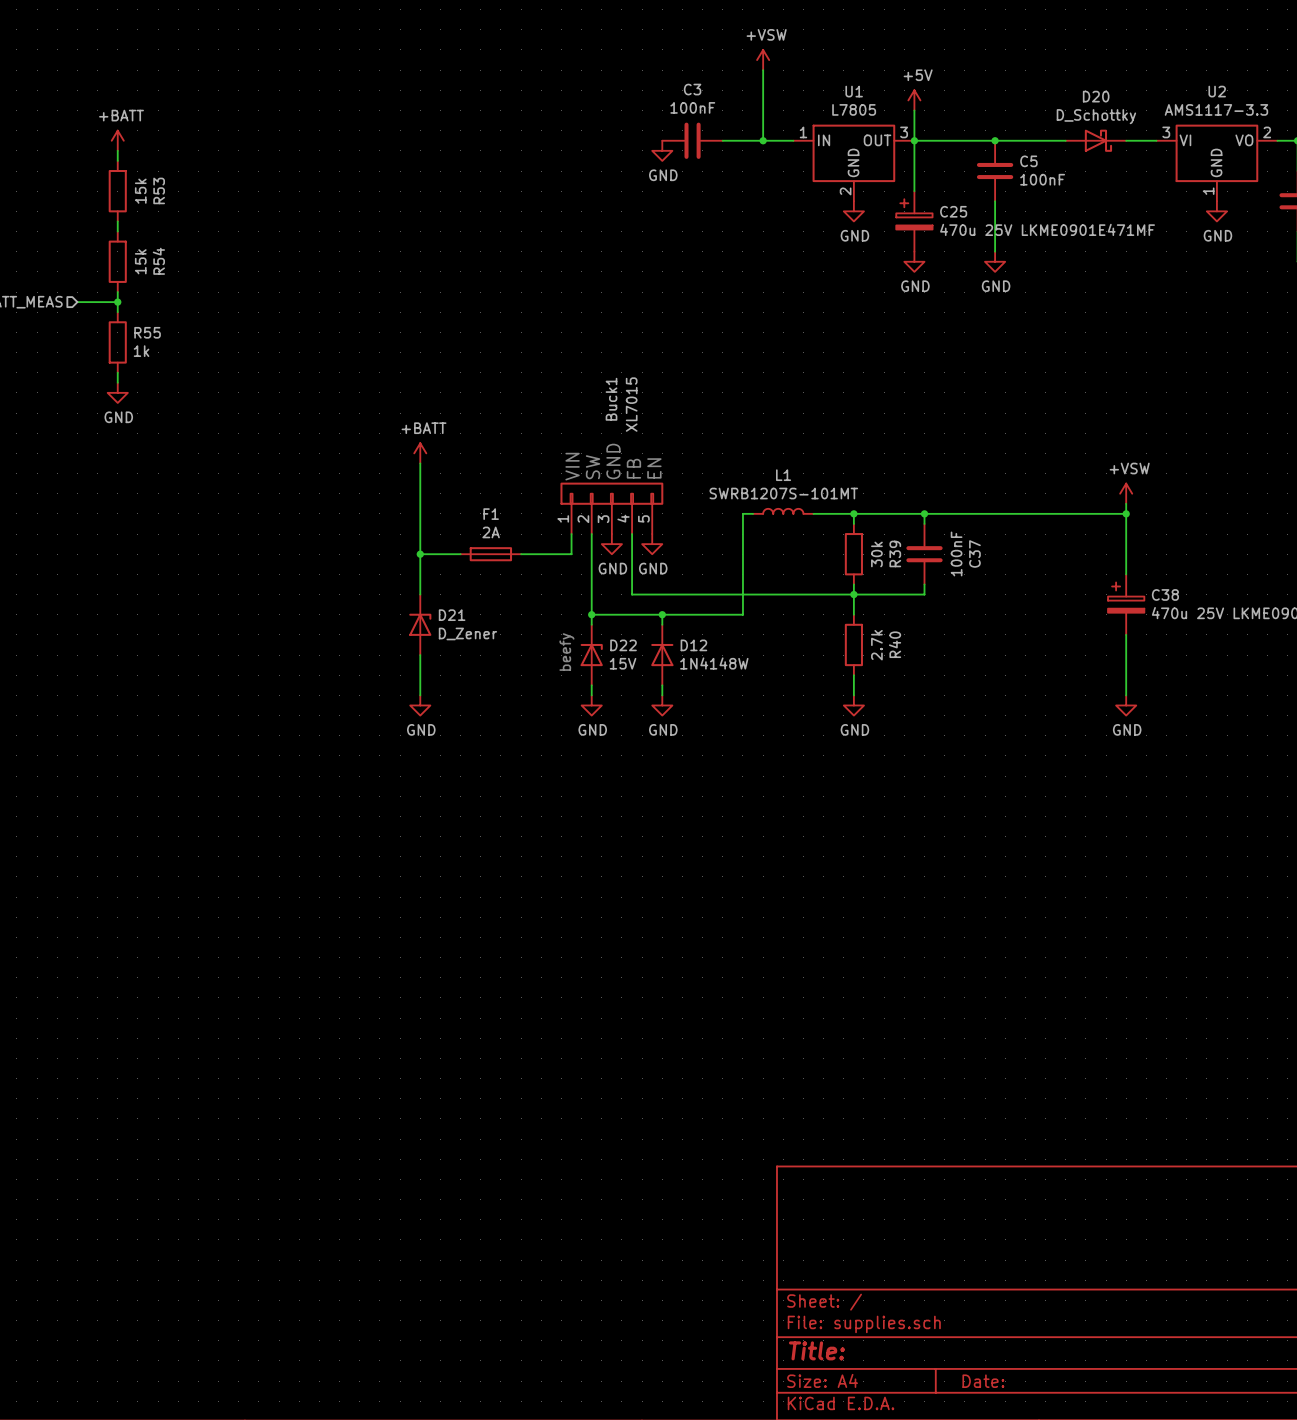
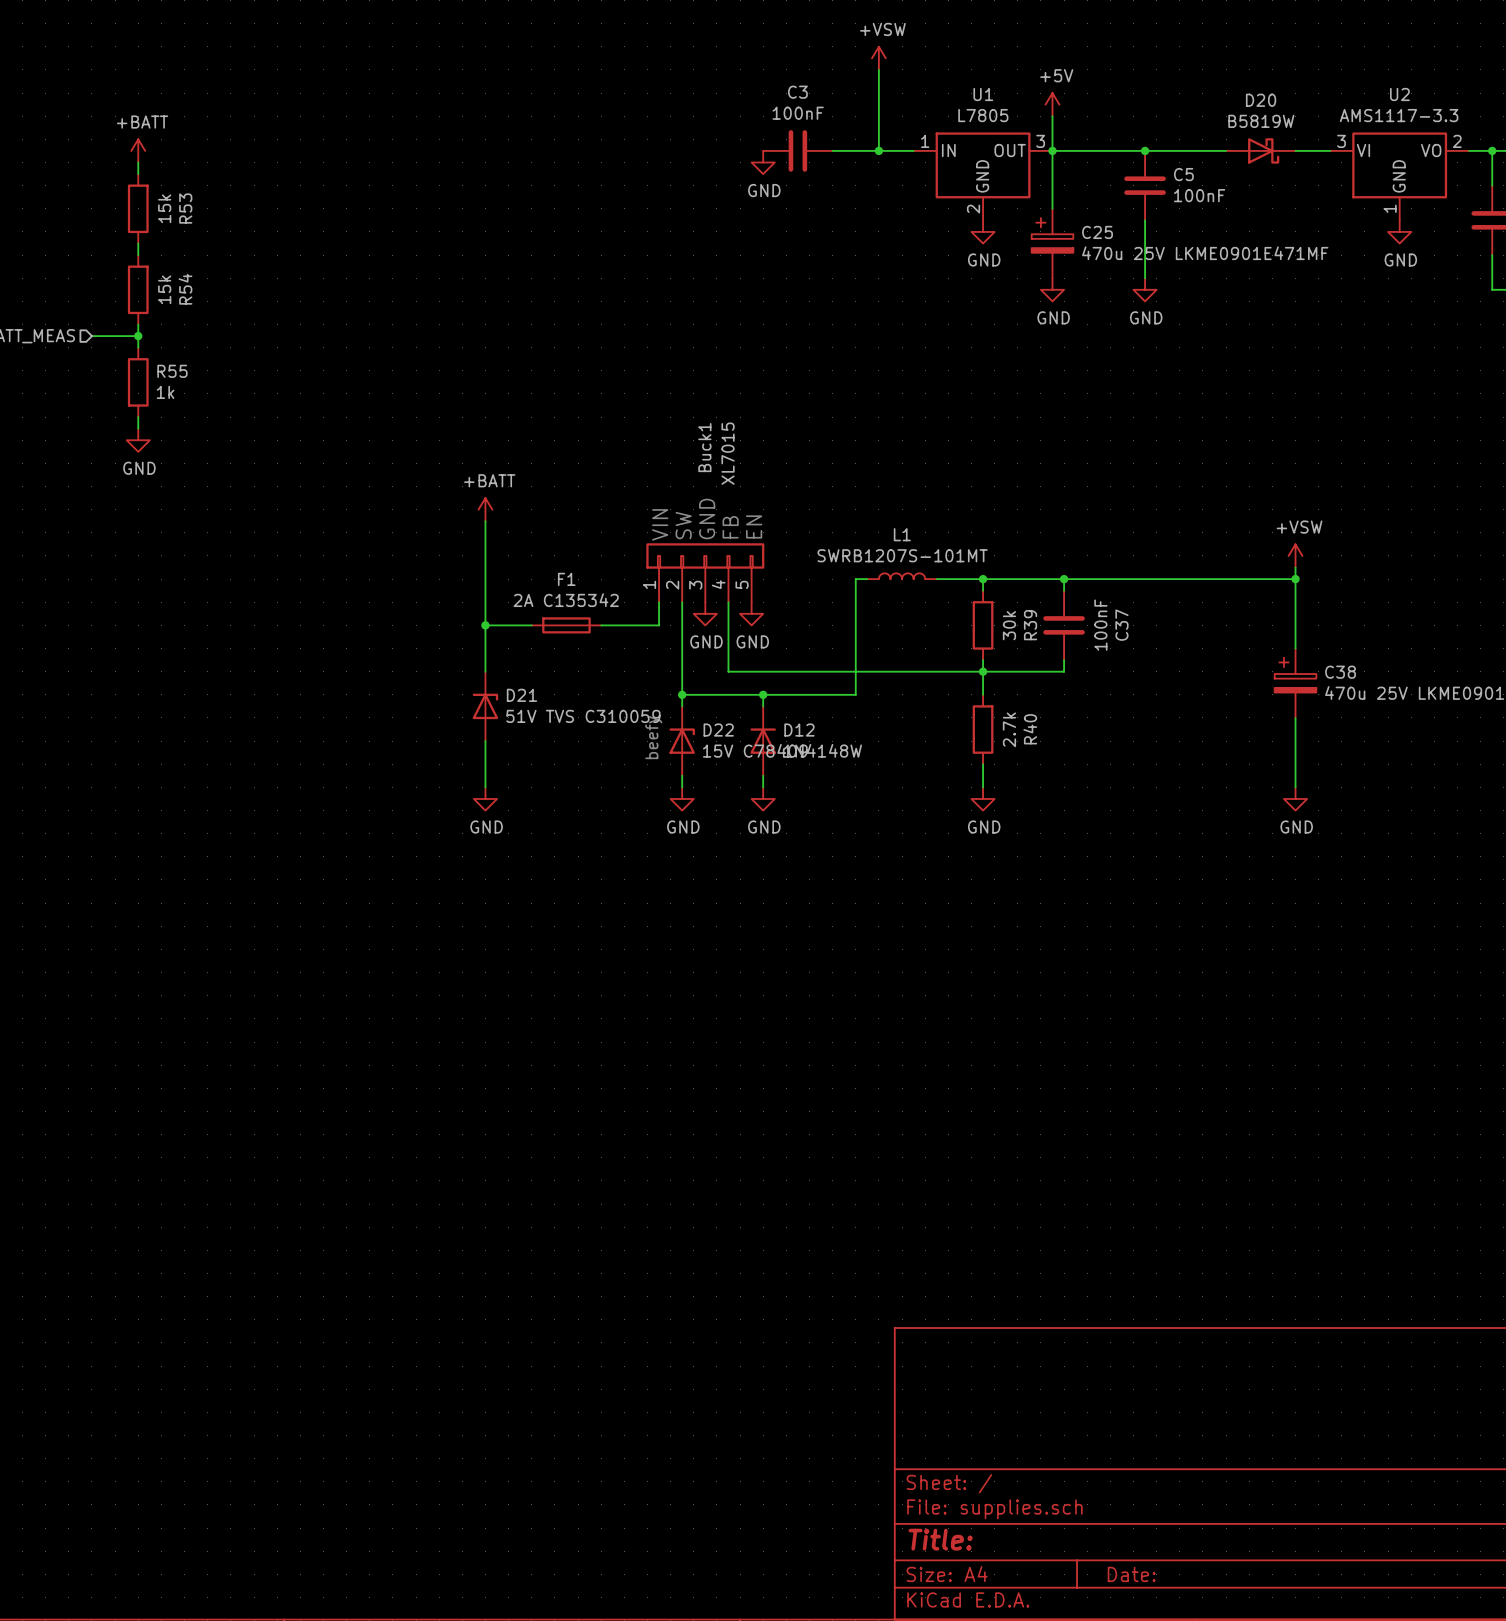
D20 value: D_Schottky (1096, 116) -> B5819W (1261, 121)
F1 value: 2A (491, 532) -> 2A C135342 (566, 600)
D21 value: D_Zener (467, 633) -> 51V TVS C310059 (583, 716)
D22 value: 15V (623, 663) -> 15V C78409 (755, 750)

